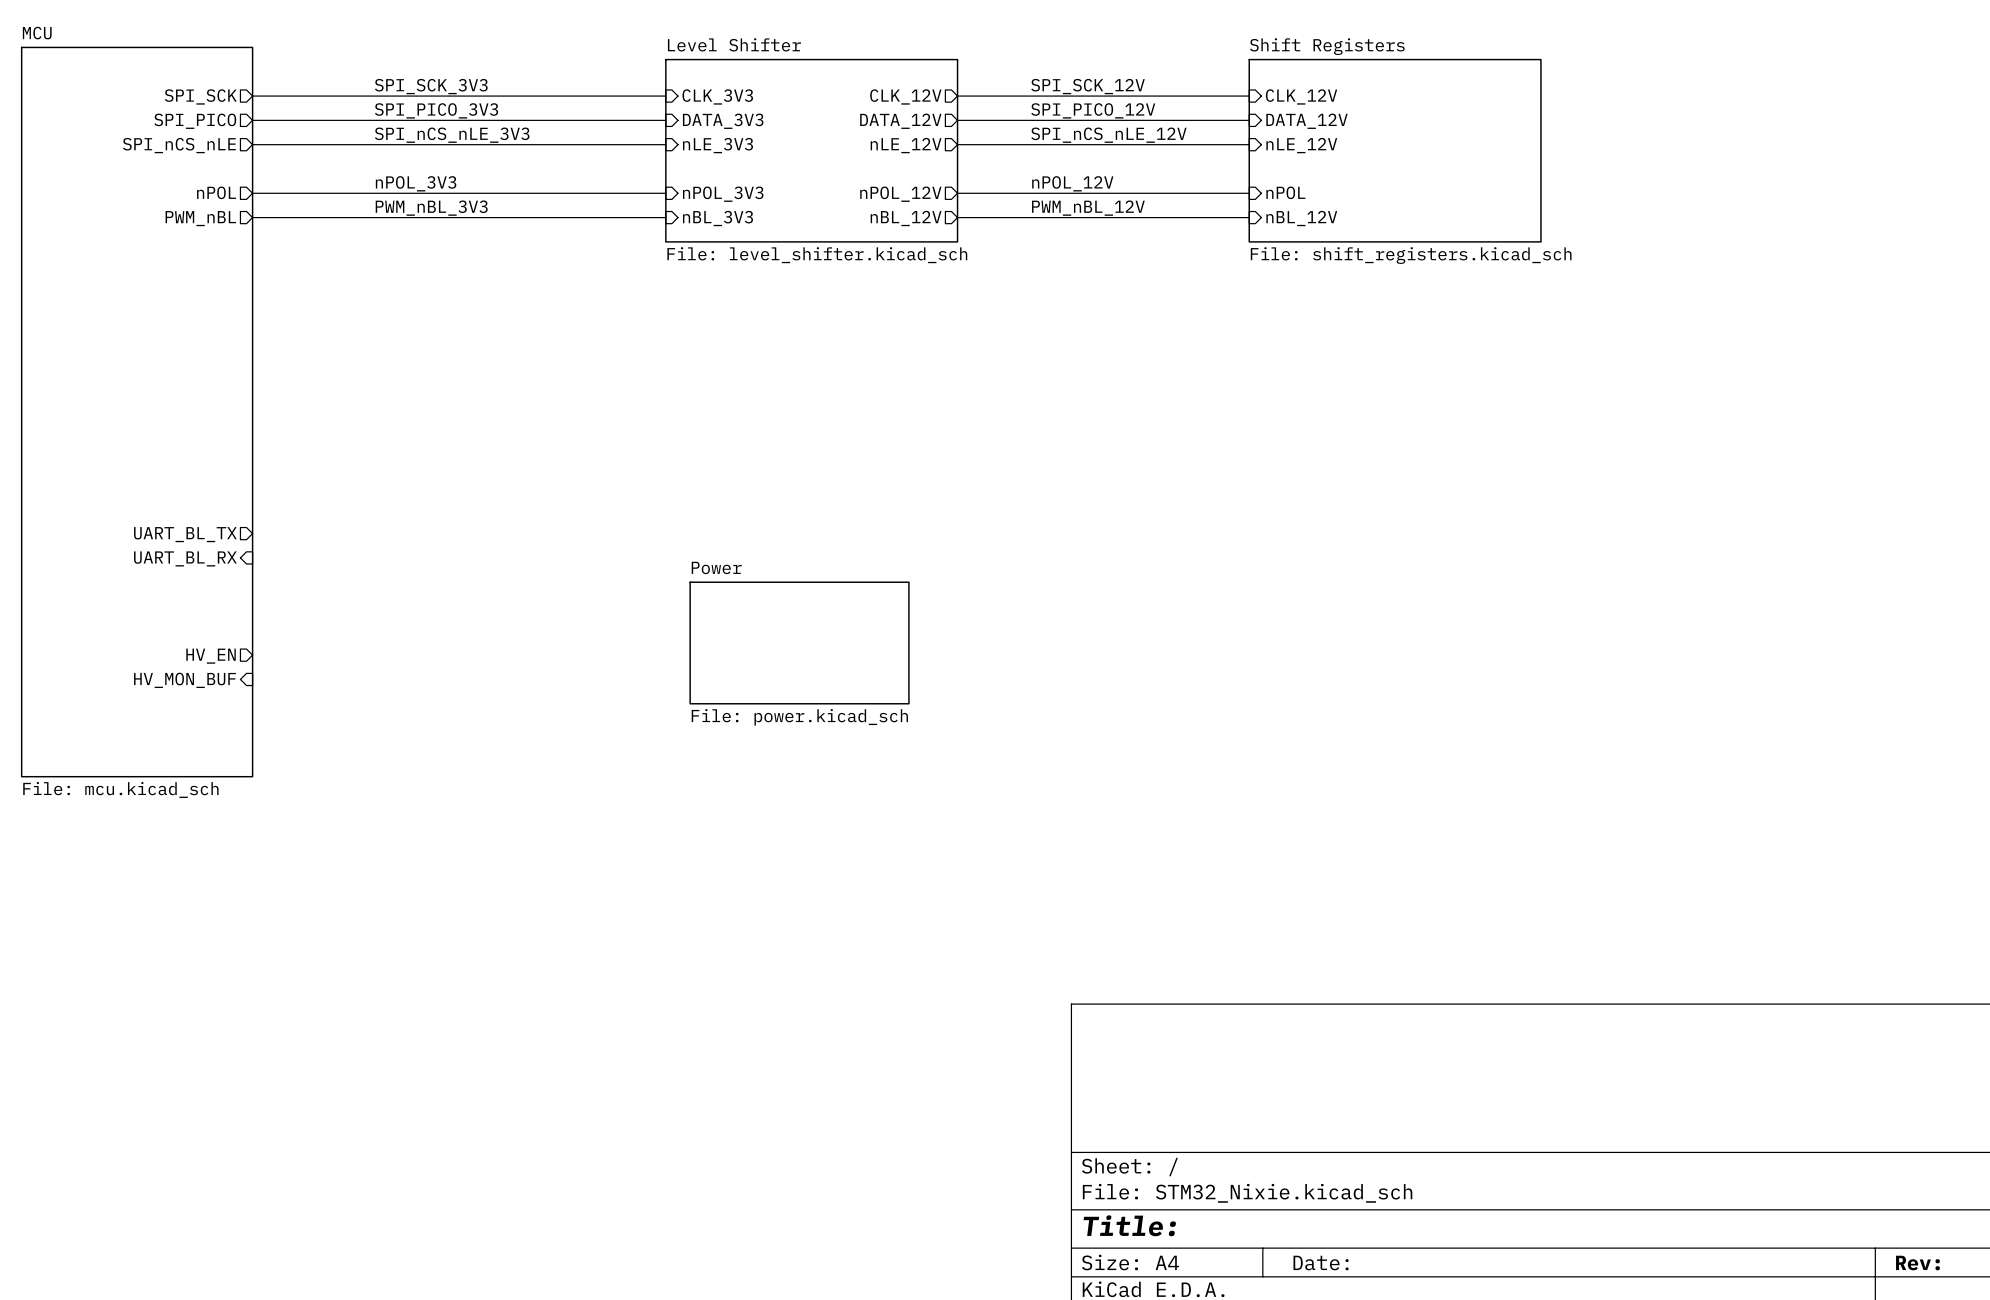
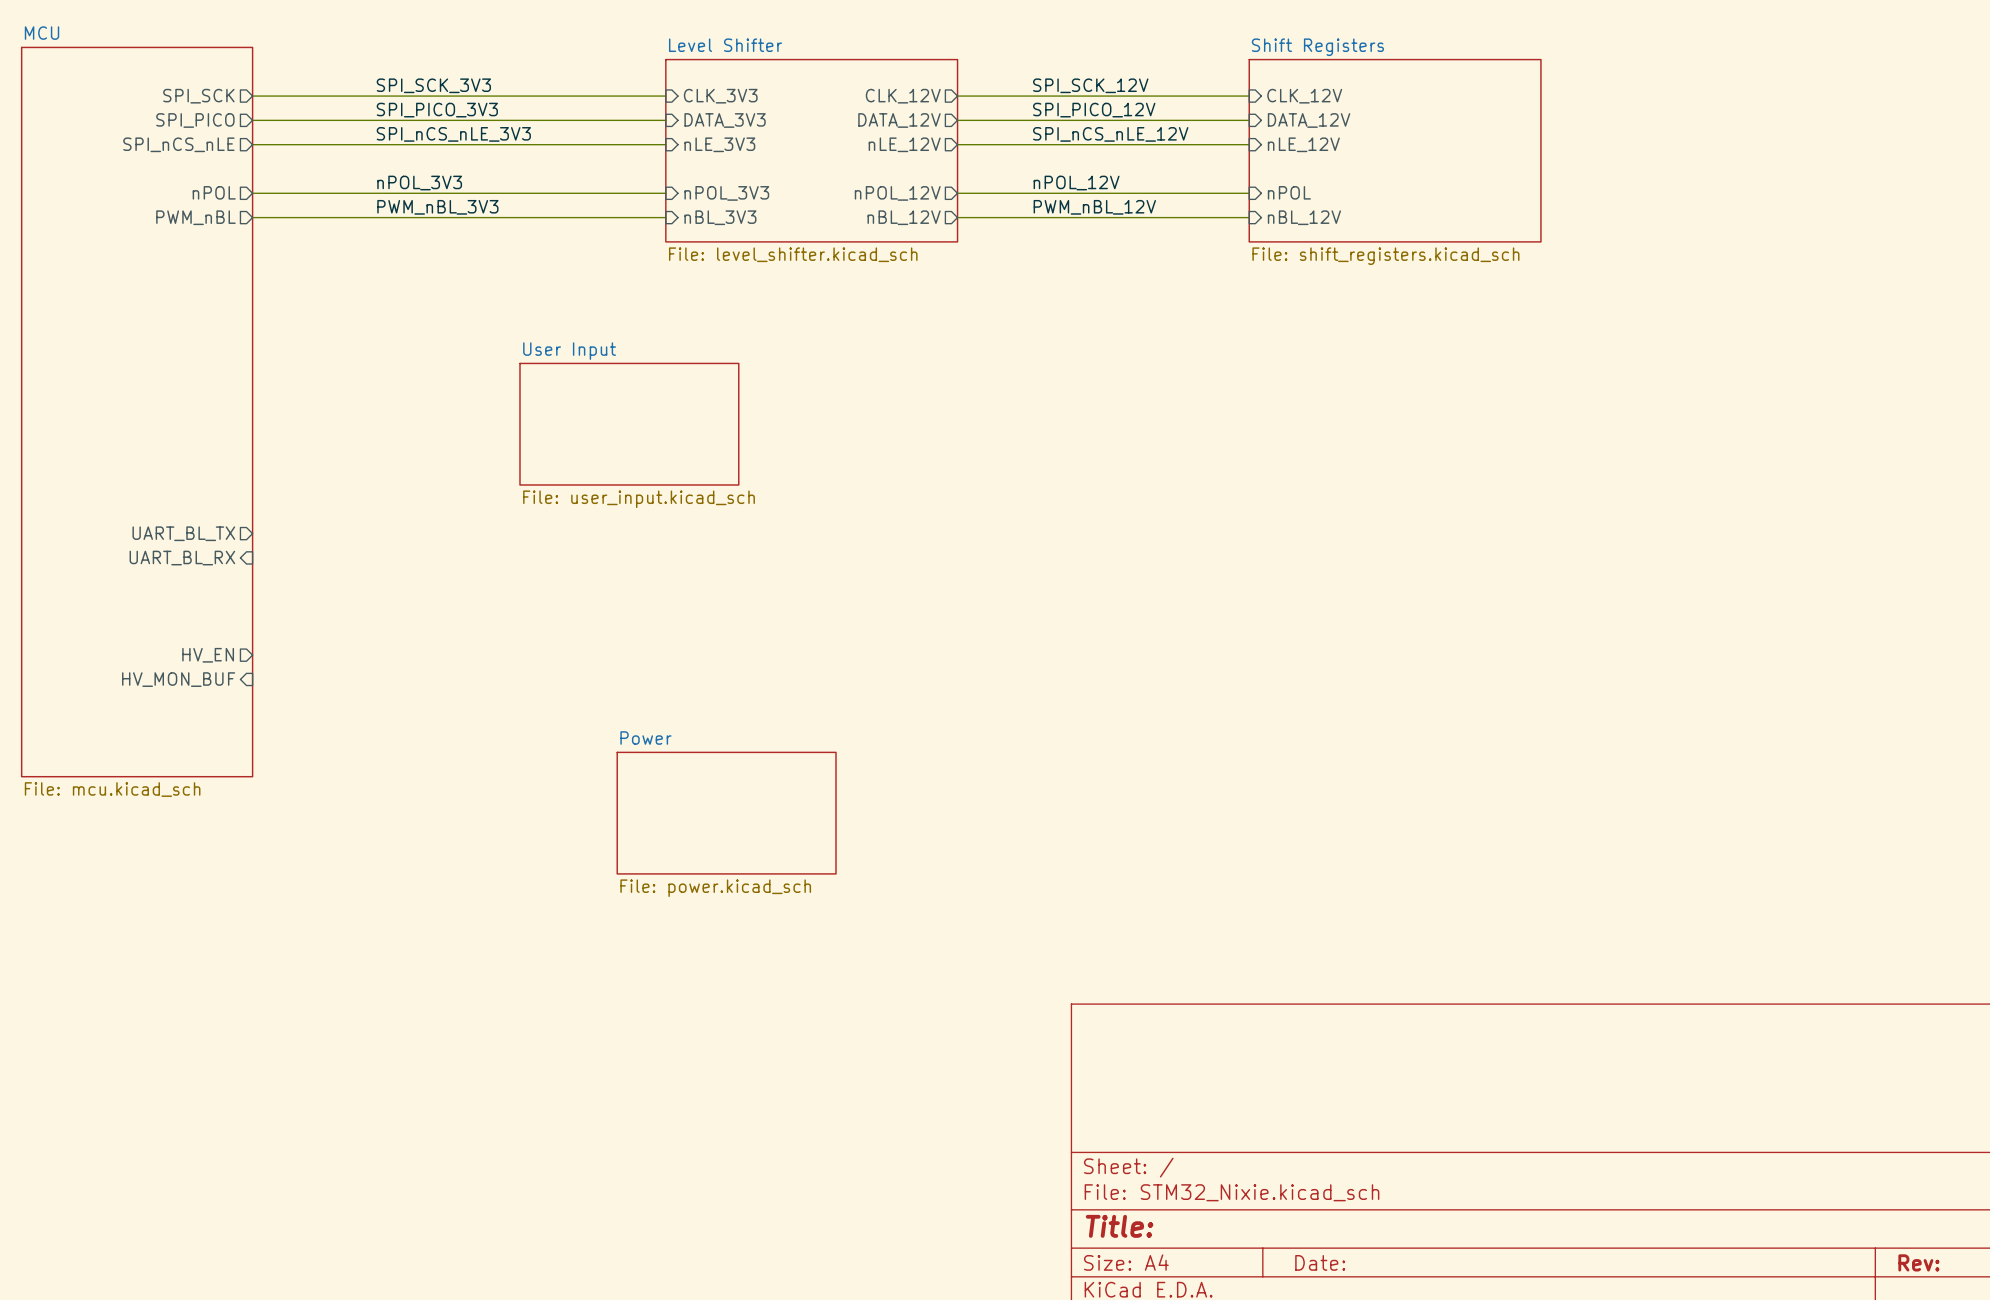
sheet User Input: none -> File: user_input.kicad_sch (629, 424)
sheet Power position: (799, 642) -> (726, 813)

